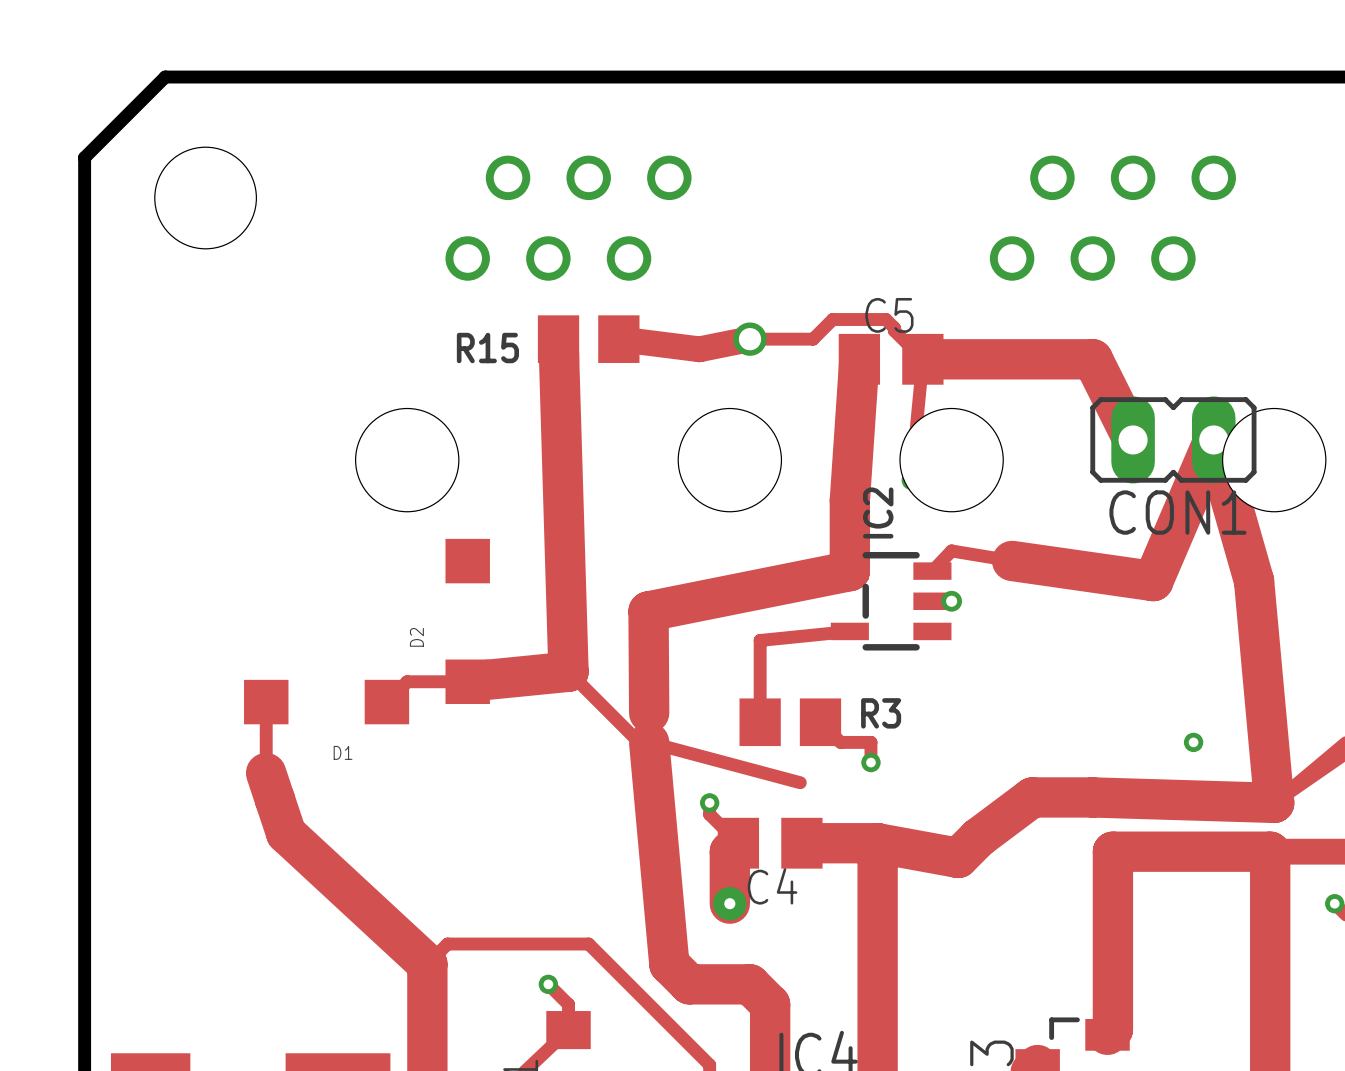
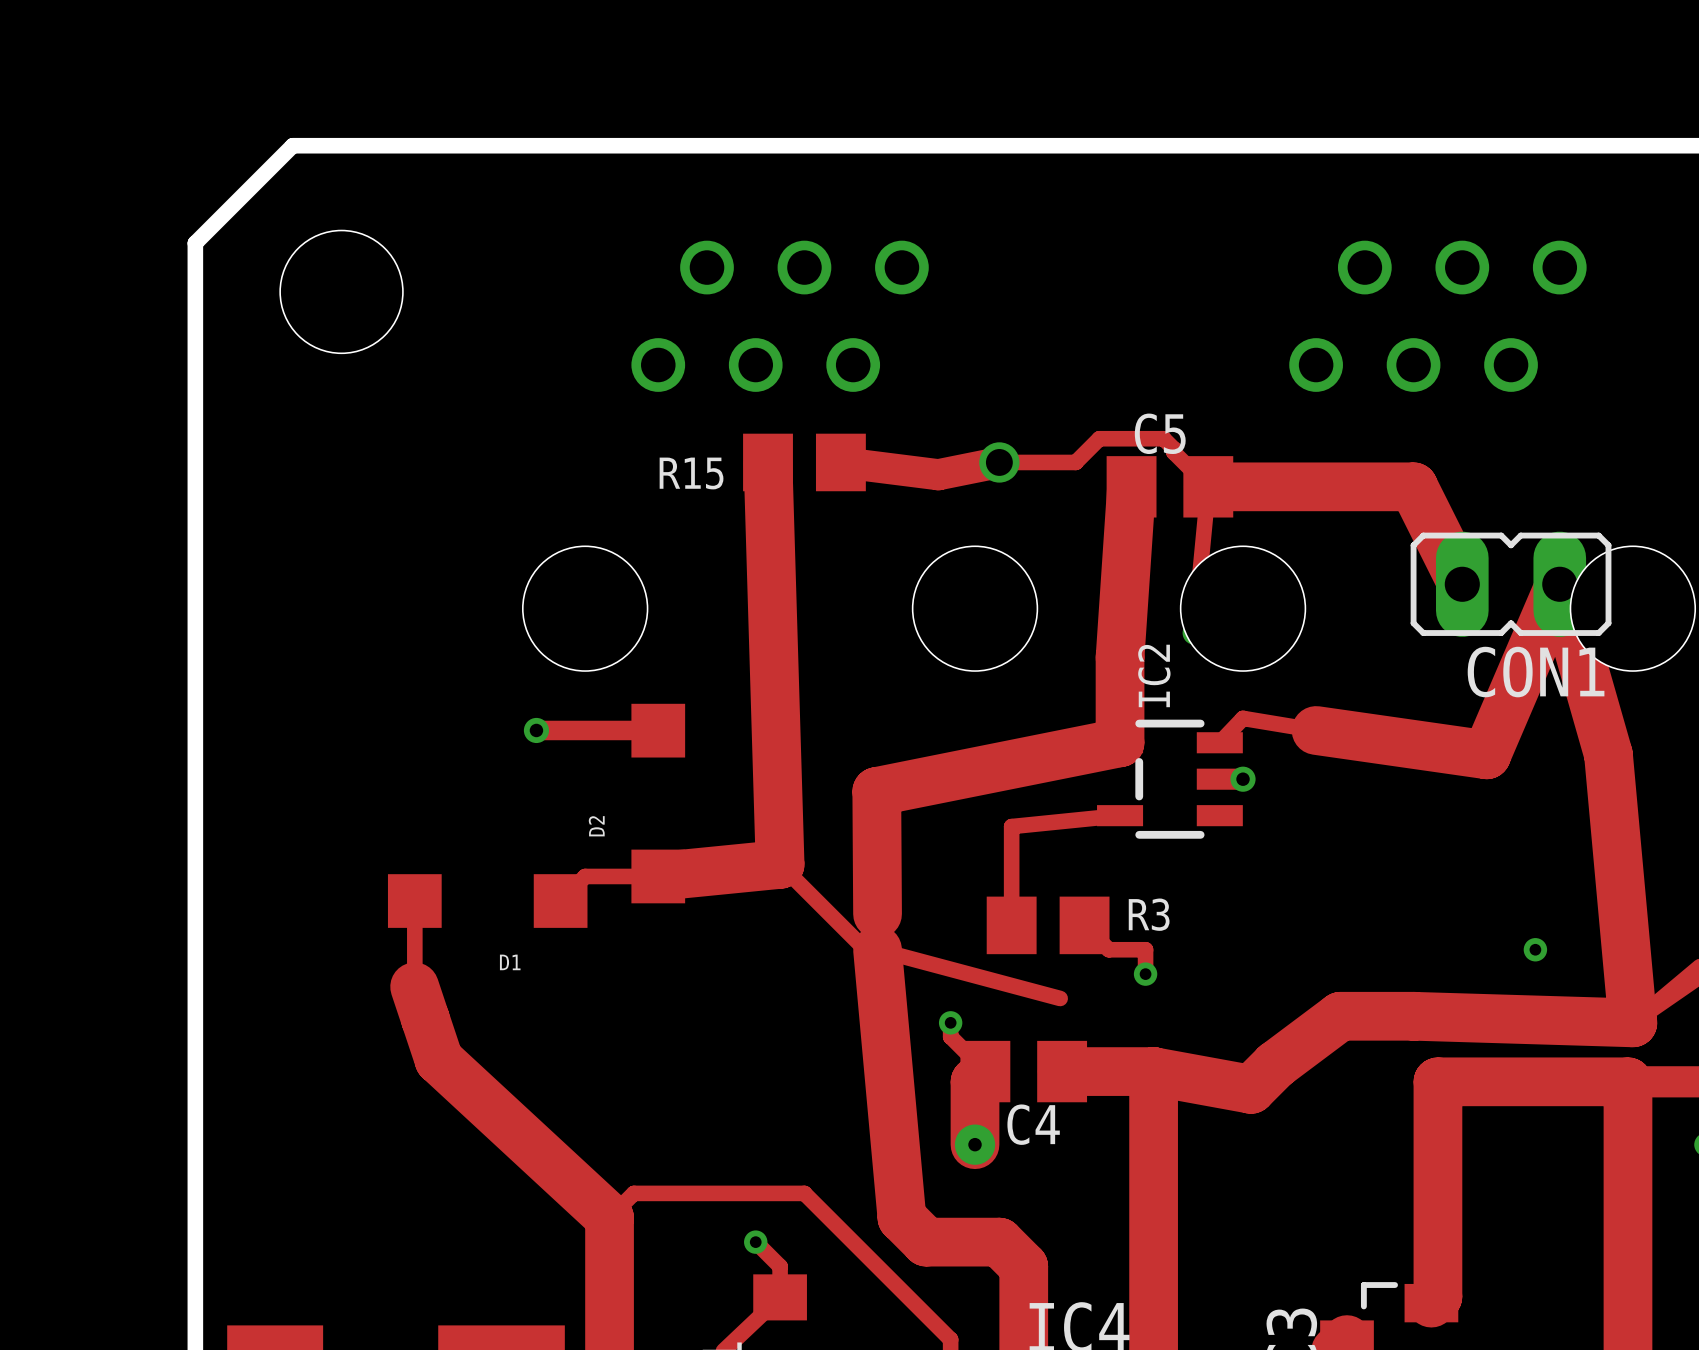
track: none -> (536, 730) (658, 730)
via: none -> (536, 730)

